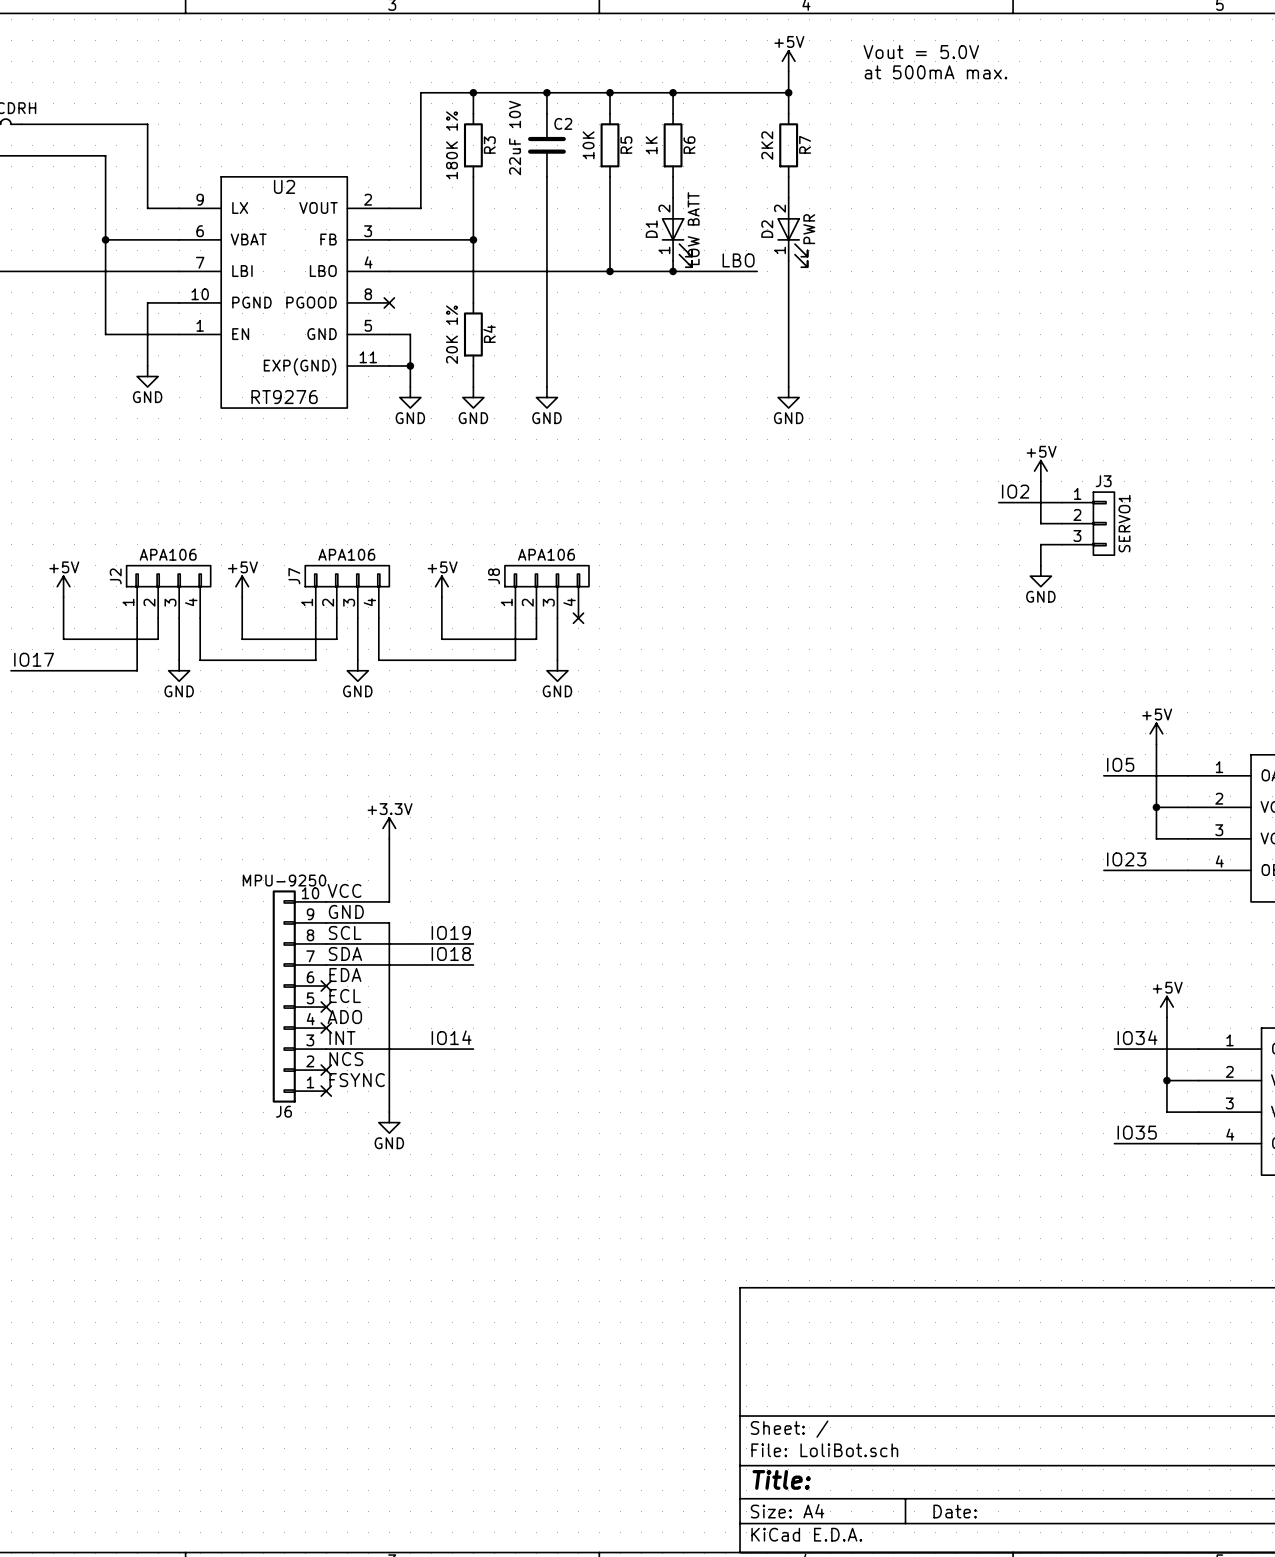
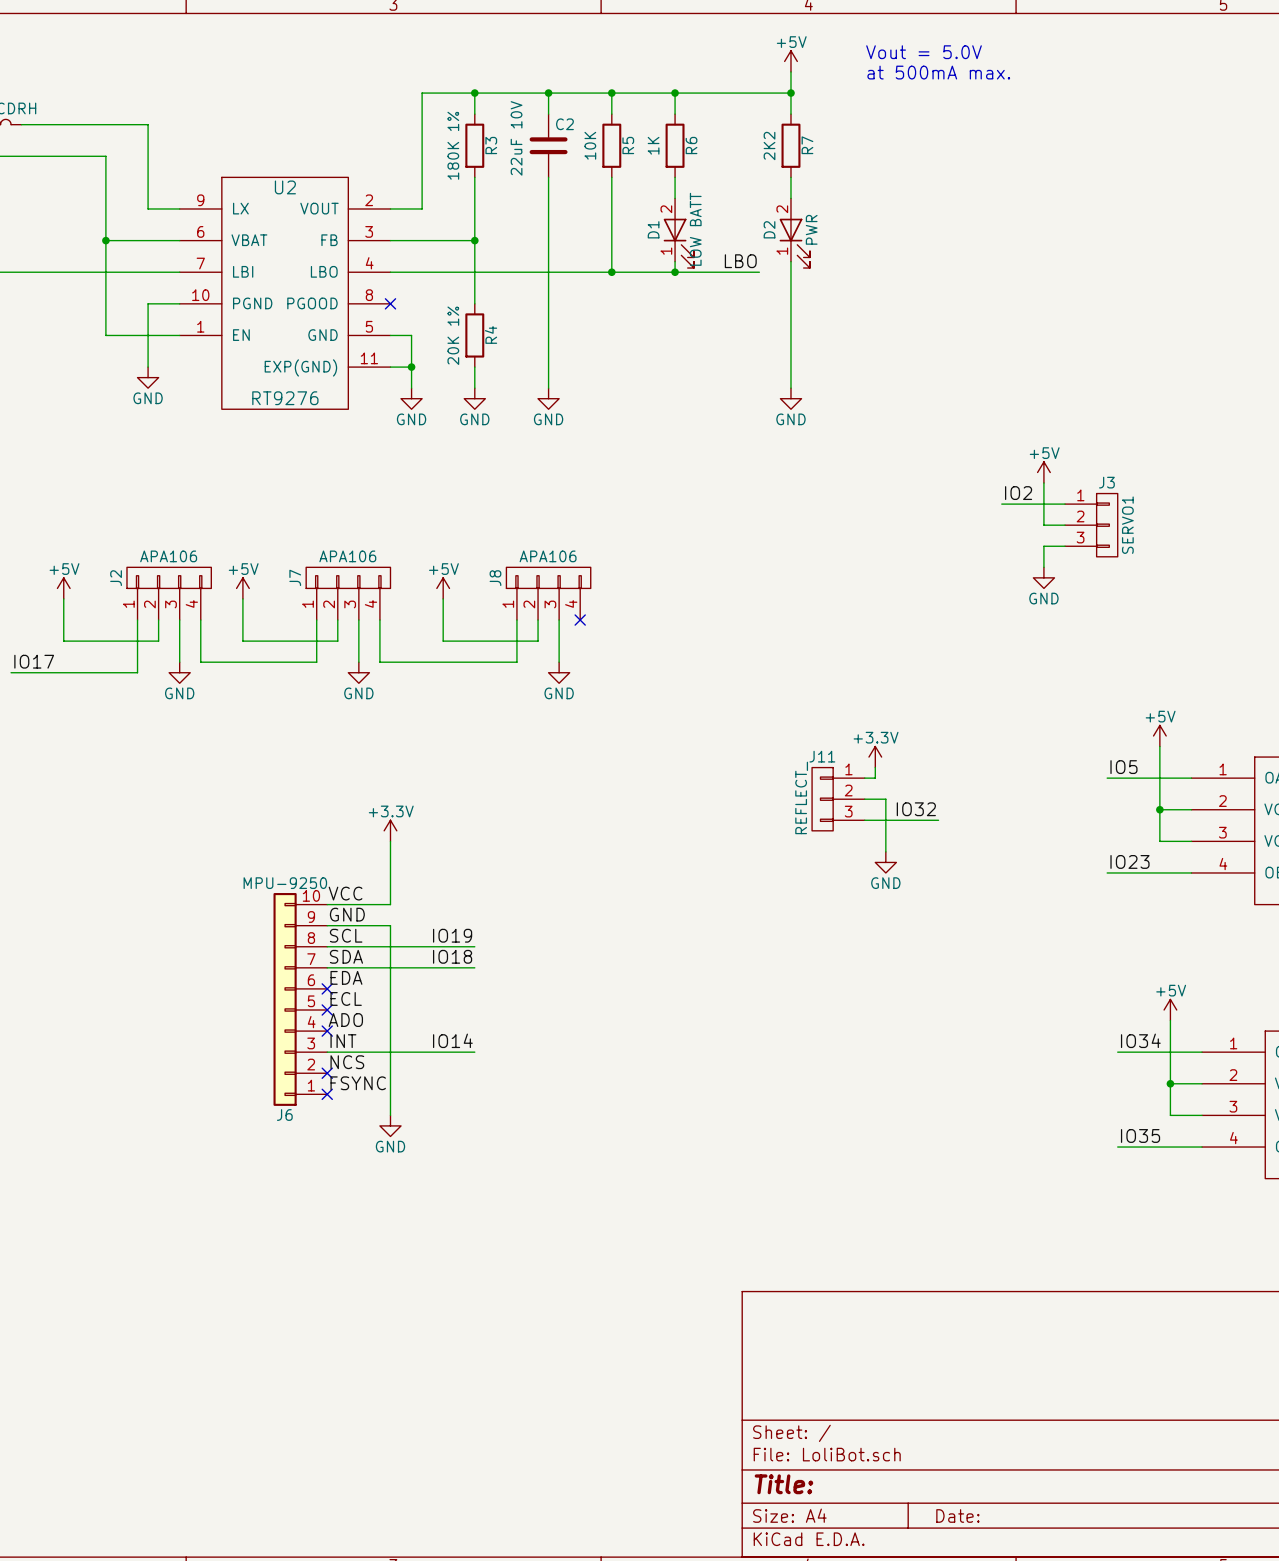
power symbol: none -> +3.3V (875, 757)
wire: none -> (875, 767) (875, 778) (864, 778)
J11: none -> REFLECT_ (838, 799)
wire: none -> (864, 799) (885, 799) (885, 851)
label: none -> IO32 (916, 809)
wire: none -> (864, 820) (938, 820)
power symbol: none -> GND (885, 862)

